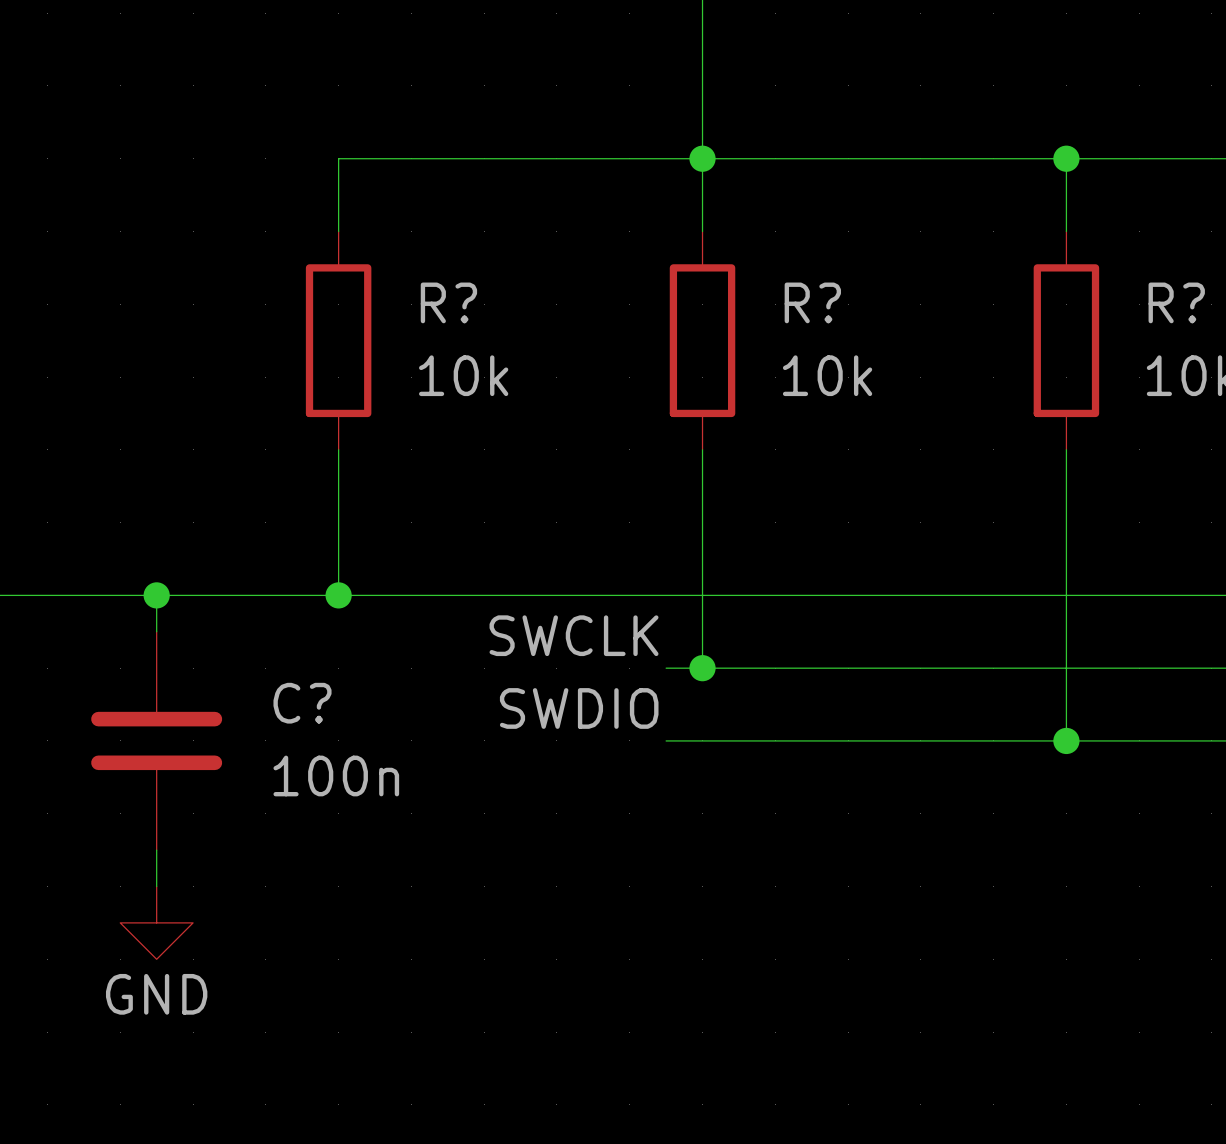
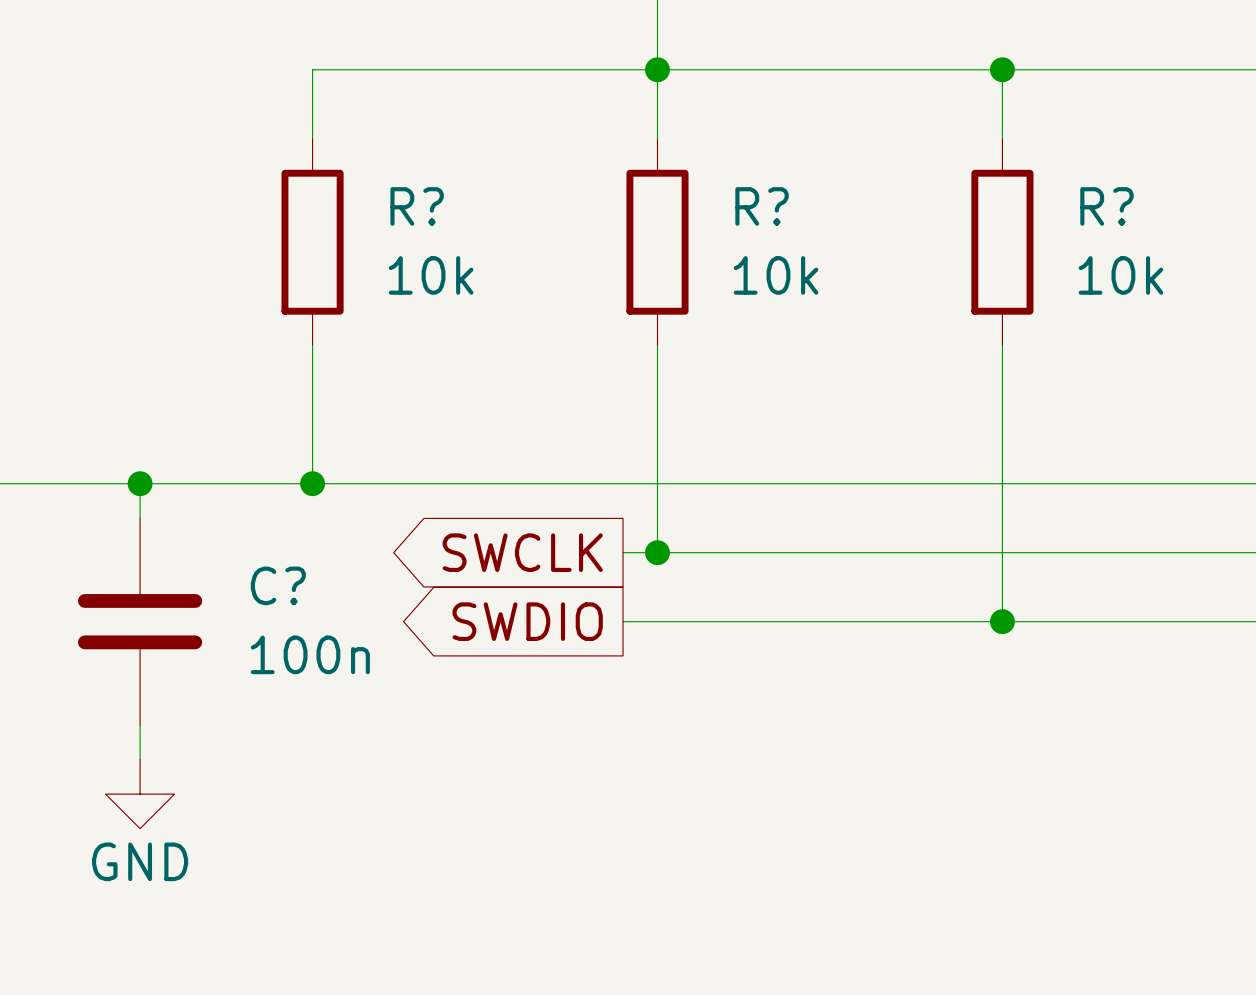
label: SWCLK (574, 635) -> none
global label: none -> SWCLK (522, 552)
label: SWDIO (579, 708) -> none
global label: none -> SWDIO (527, 621)

